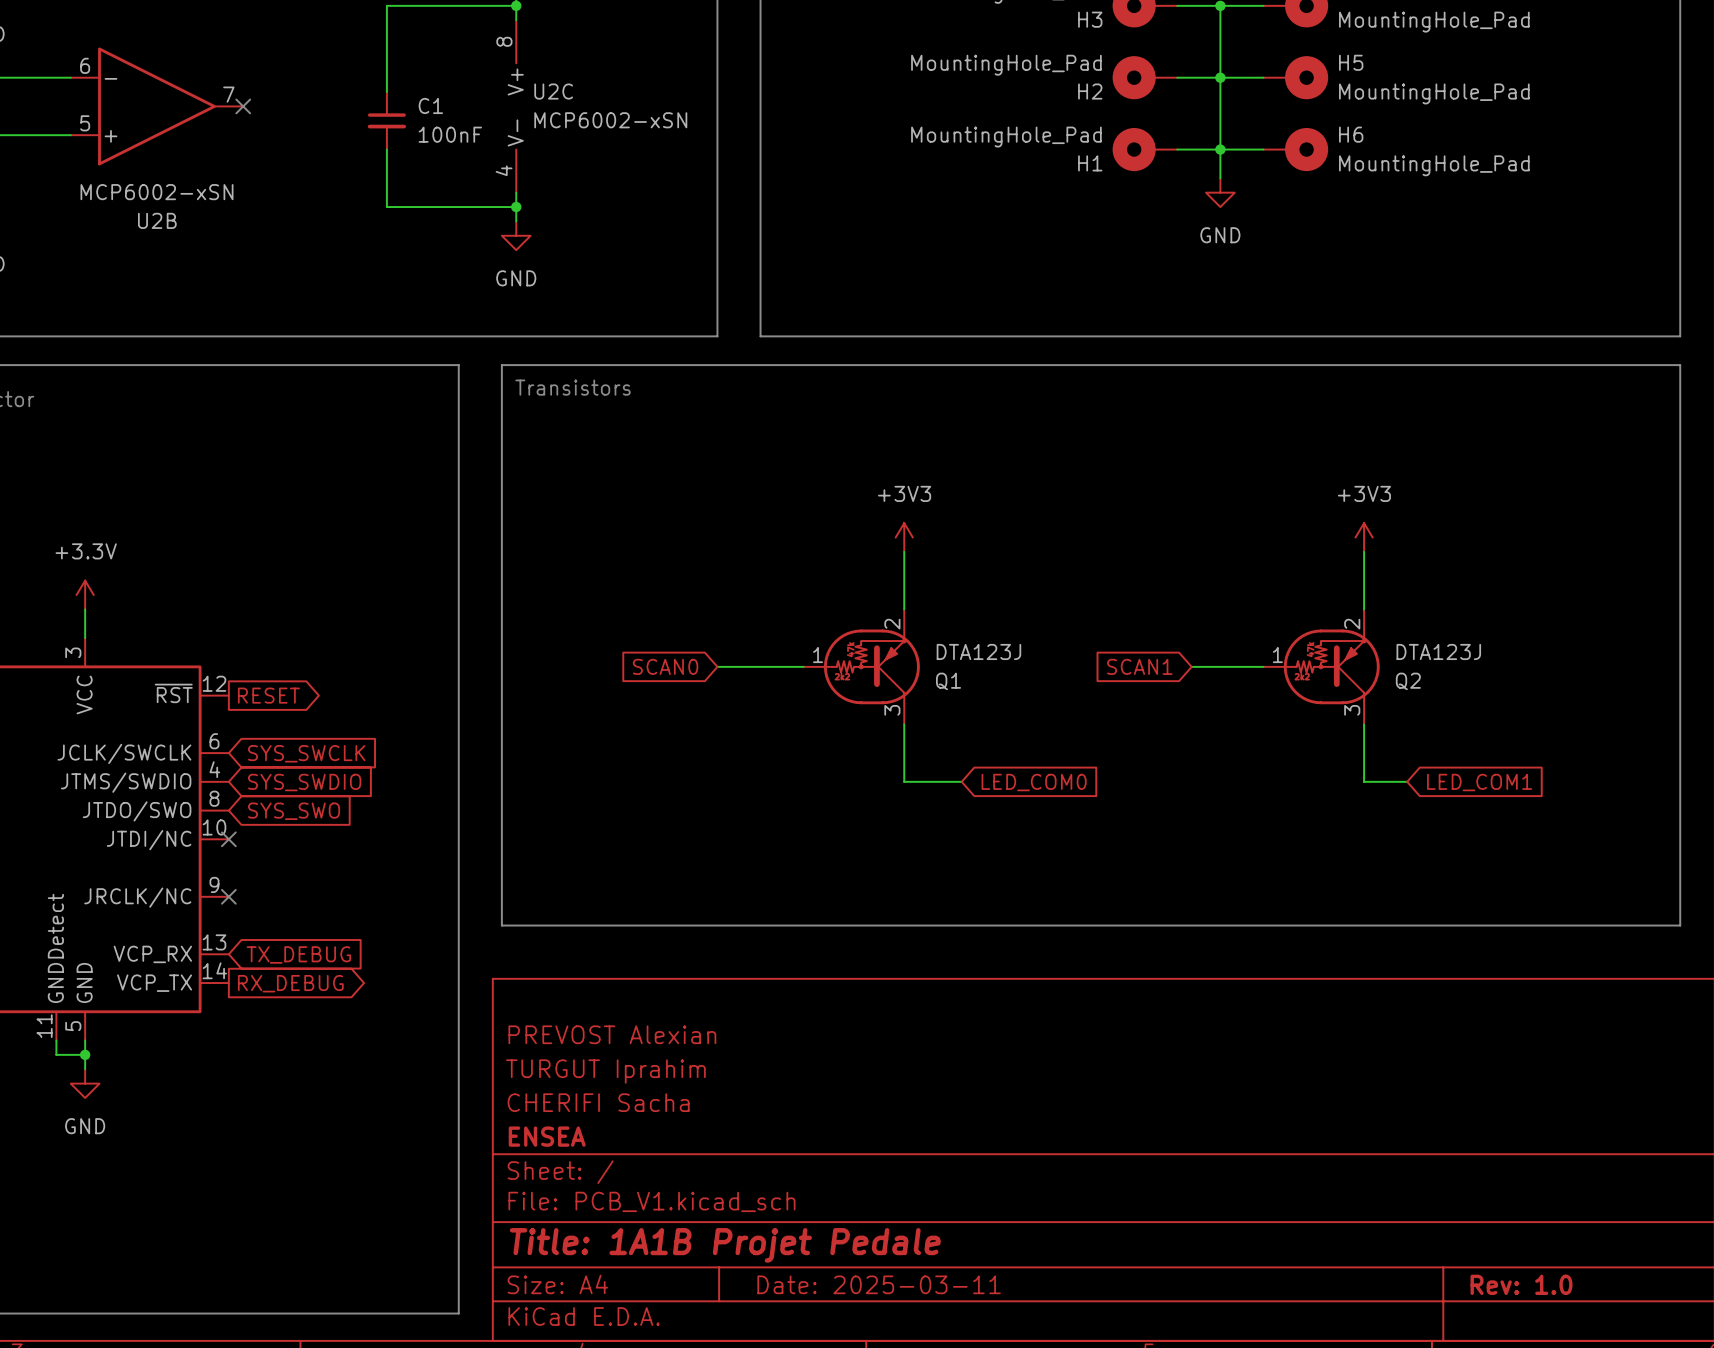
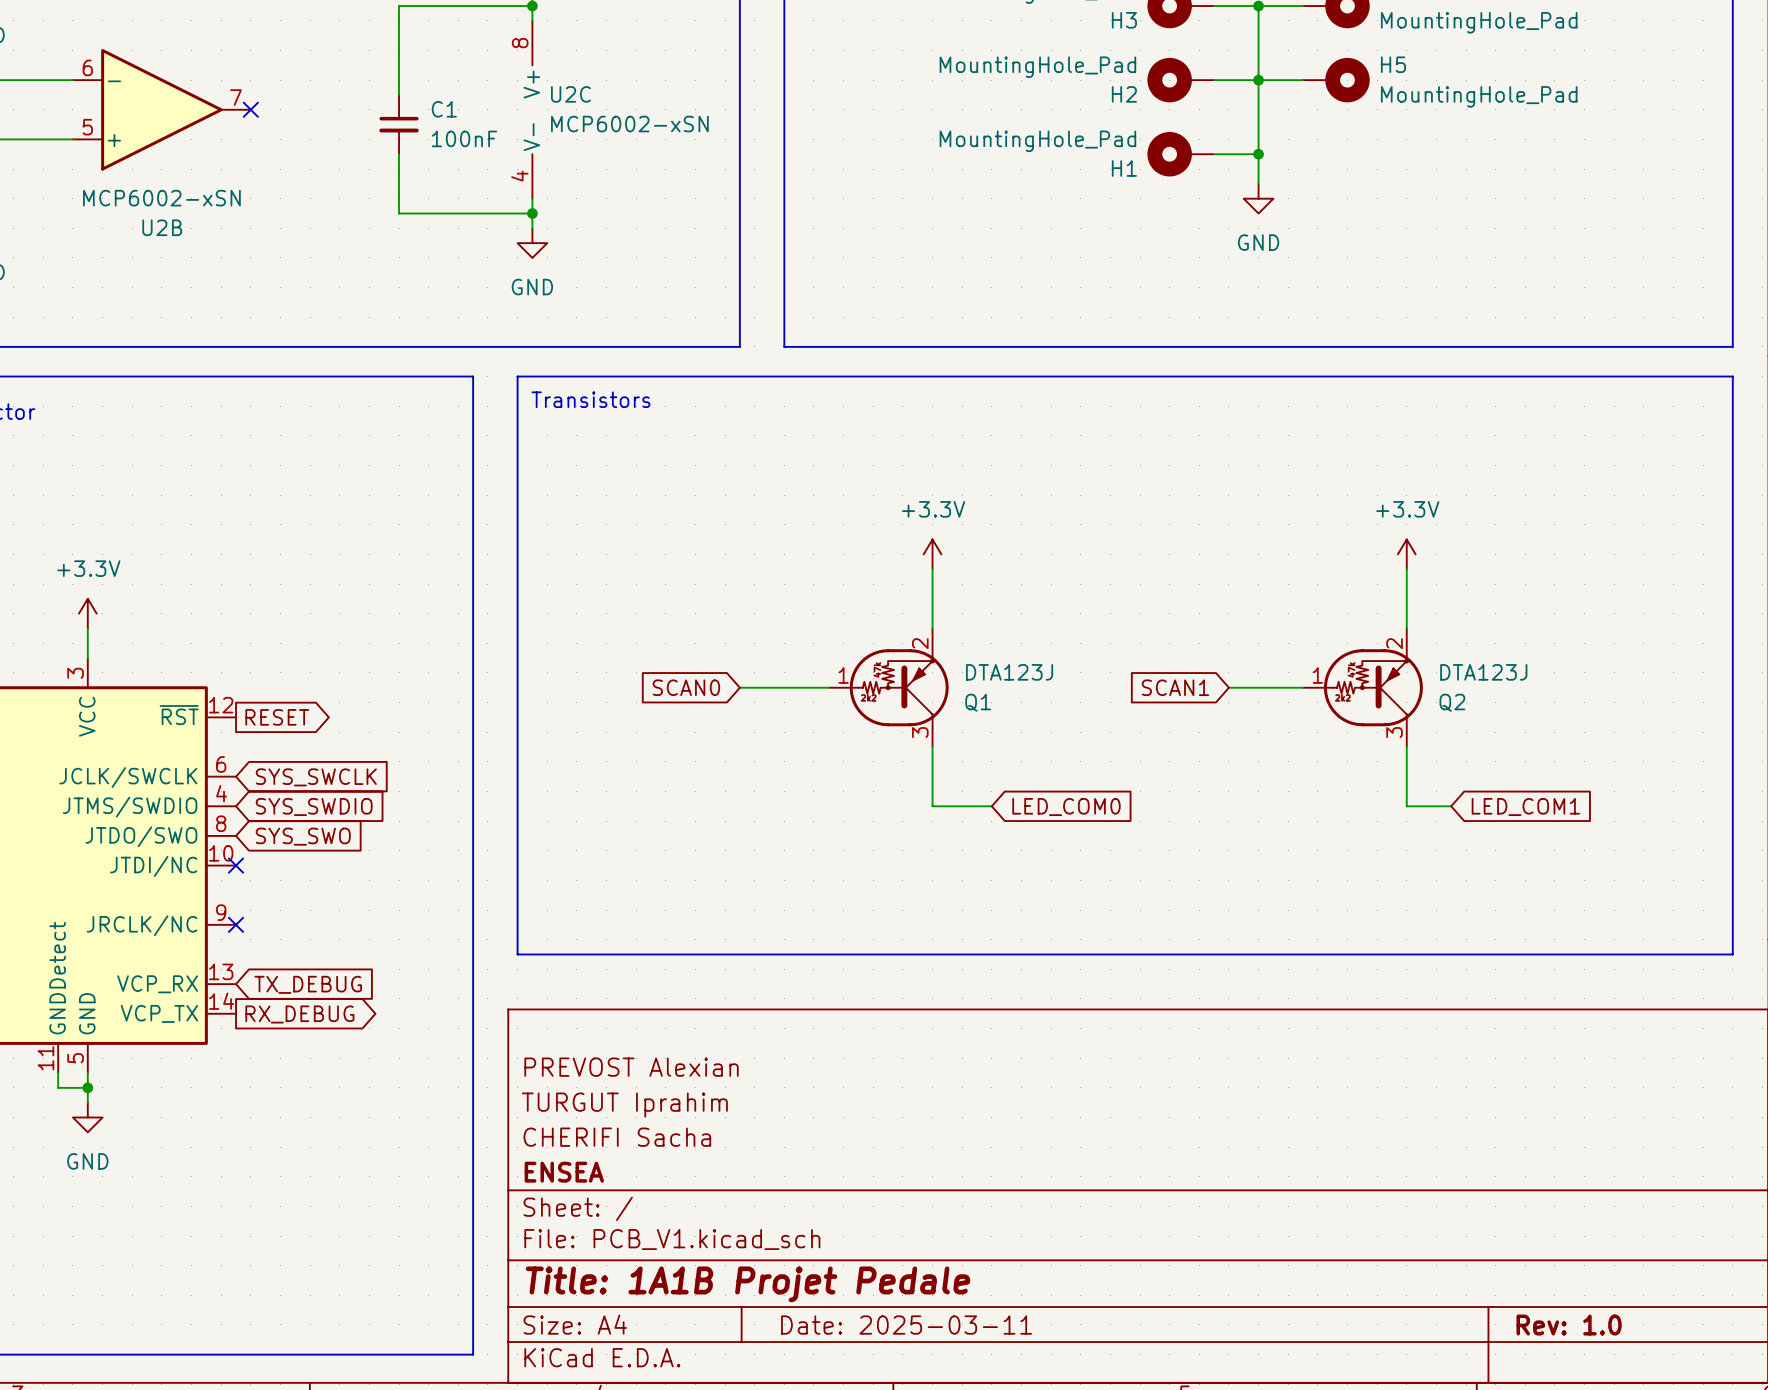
wire: (1220, 149) (1263, 149) -> none
H6: MountingHole_Pad (1295, 149) -> none
power symbol: +3V3 (904, 537) -> +3.3V (932, 554)
power symbol: +3V3 (1364, 537) -> +3.3V (1406, 554)

